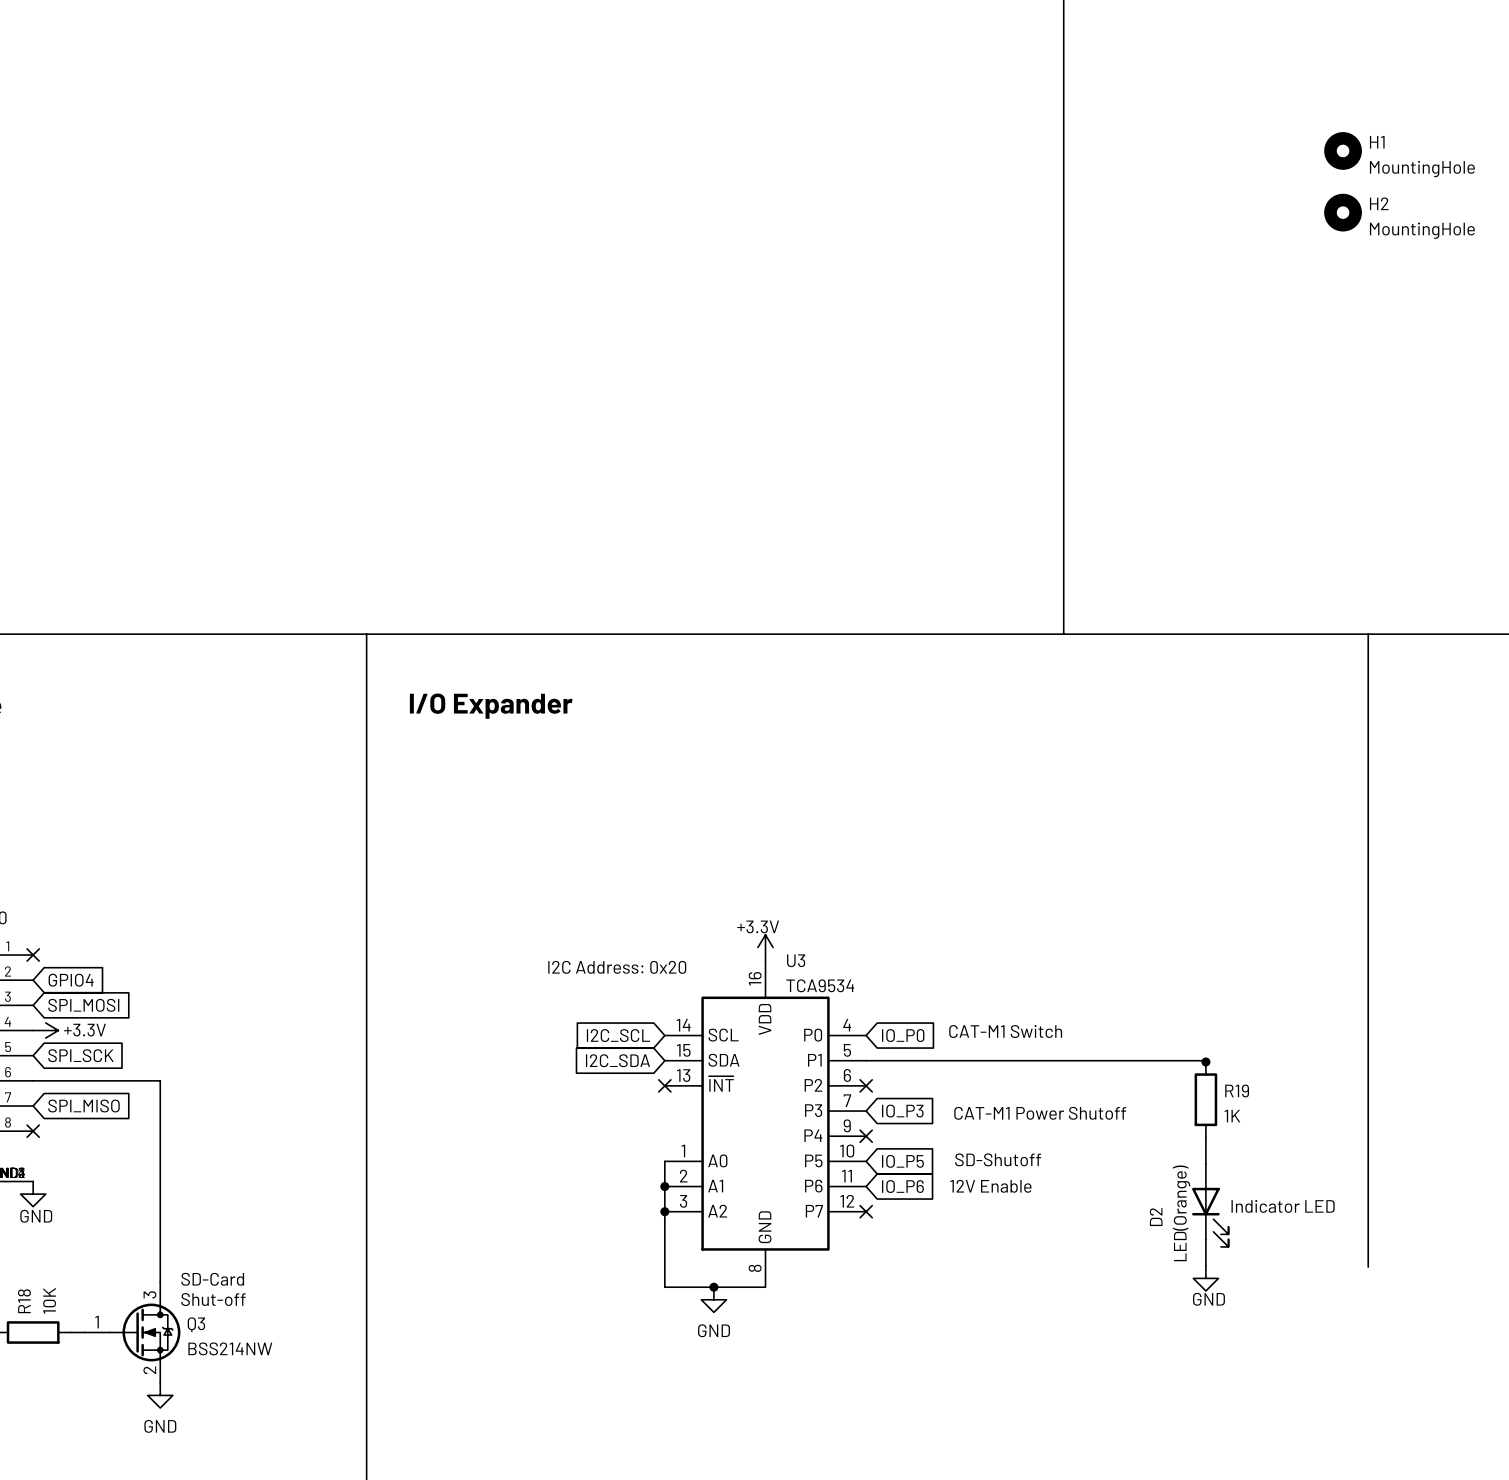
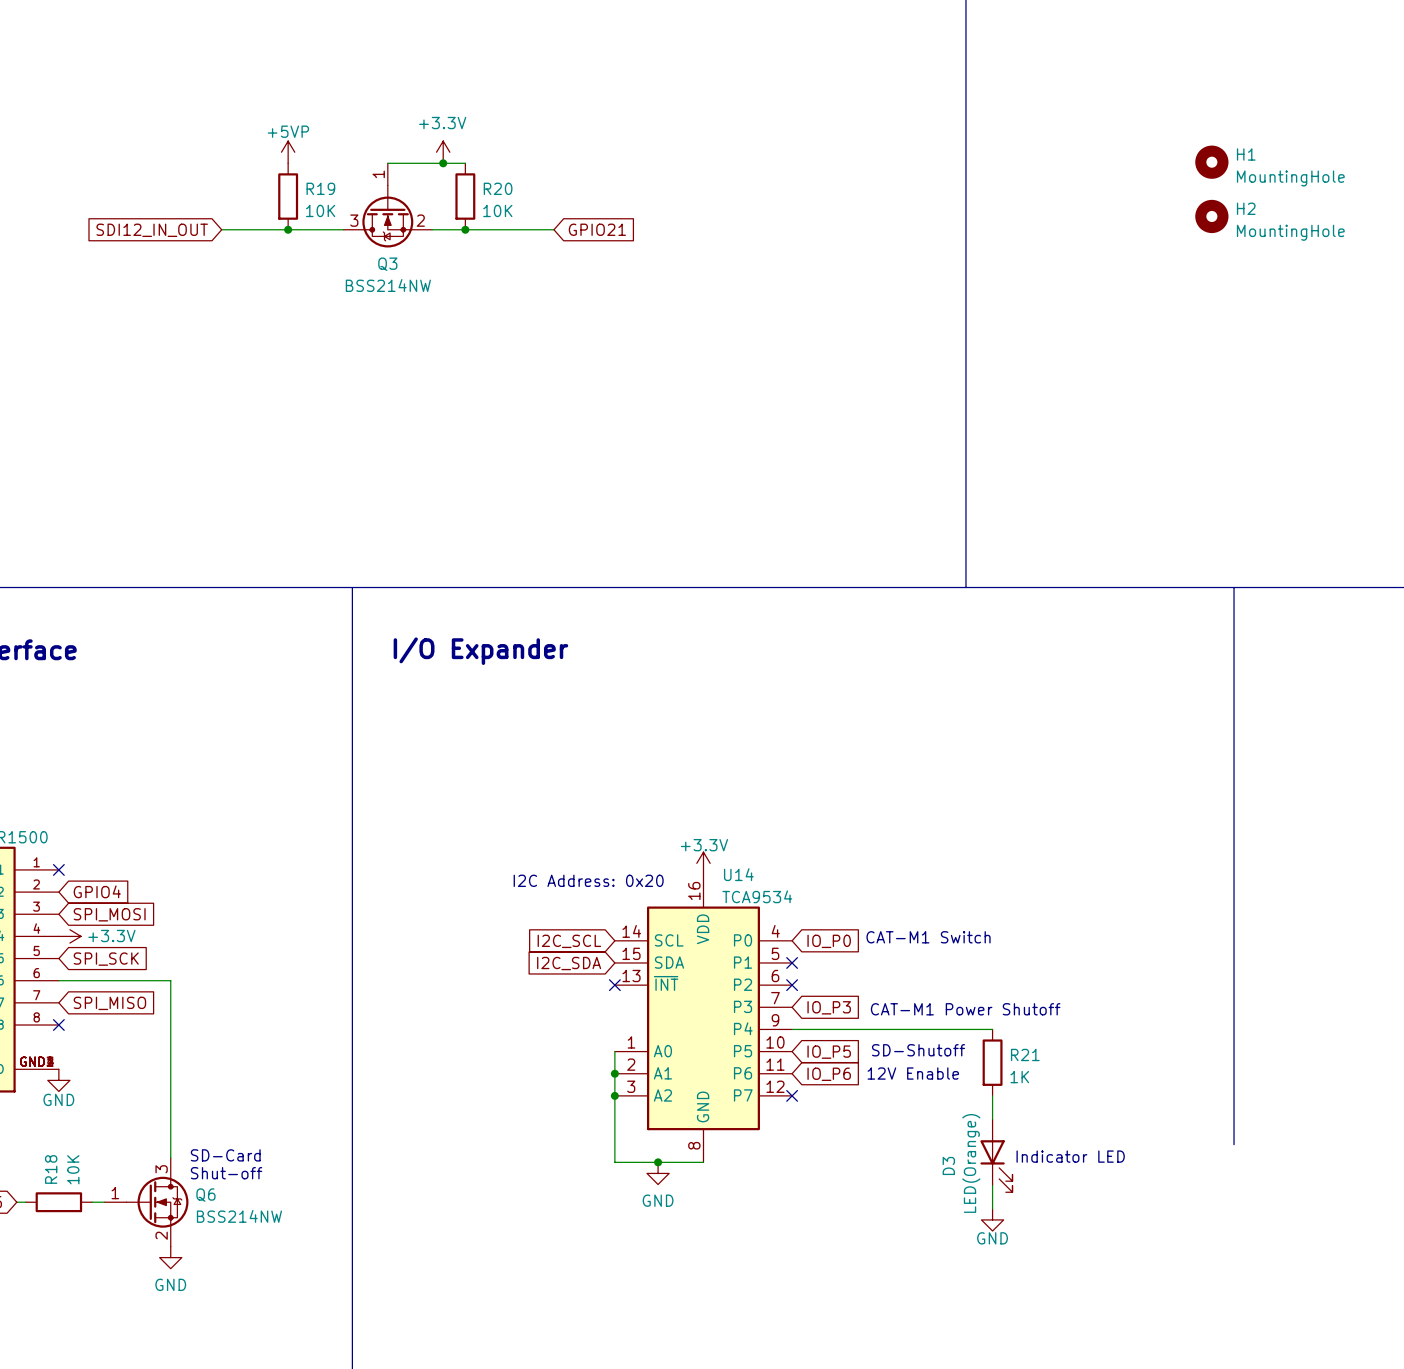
power symbol: none -> +5VP (288, 152)
power symbol: none -> +3.3V (443, 152)
wire: none -> (387, 163) (465, 163)
junction: none -> (443, 163)
R20: none -> 10K (465, 196)
Q3: none -> BSS214NW (387, 205)
global label: none -> SDI12_IN_OUT (152, 230)
wire: none -> (221, 229) (343, 229)
junction: none -> (288, 229)
wire: none -> (432, 229) (553, 229)
junction: none -> (465, 229)
global label: none -> GPIO21 (597, 229)
U3 name: U3 (796, 960) -> U14 (738, 874)
wire: (866, 1060) (1205, 1061) -> none
no-connect mark: none -> (792, 962)
junction: (1205, 1061) -> none
R19 position: (1205, 1099) -> (288, 196)
R19 value: 1K (1232, 1116) -> 10K (320, 210)
wire: none -> (792, 1029) (992, 1029)
no-connect mark: (866, 1136) -> none
wire: (1205, 1137) (1205, 1163) -> (992, 1095) (992, 1119)
R21: none -> 1K (992, 1062)
D2: LED(Orange) (1210, 1205) -> none
text position: Indicator LED (1283, 1206) -> Indicator LED (1070, 1156)
wire: (1205, 1239) (1205, 1265) -> (992, 1185) (992, 1208)
power symbol position: GND (1205, 1278) -> GND (992, 1219)
D3: none -> LED(Orange) (996, 1155)
Q3 name: Q3 (196, 1324) -> Q6 (205, 1195)

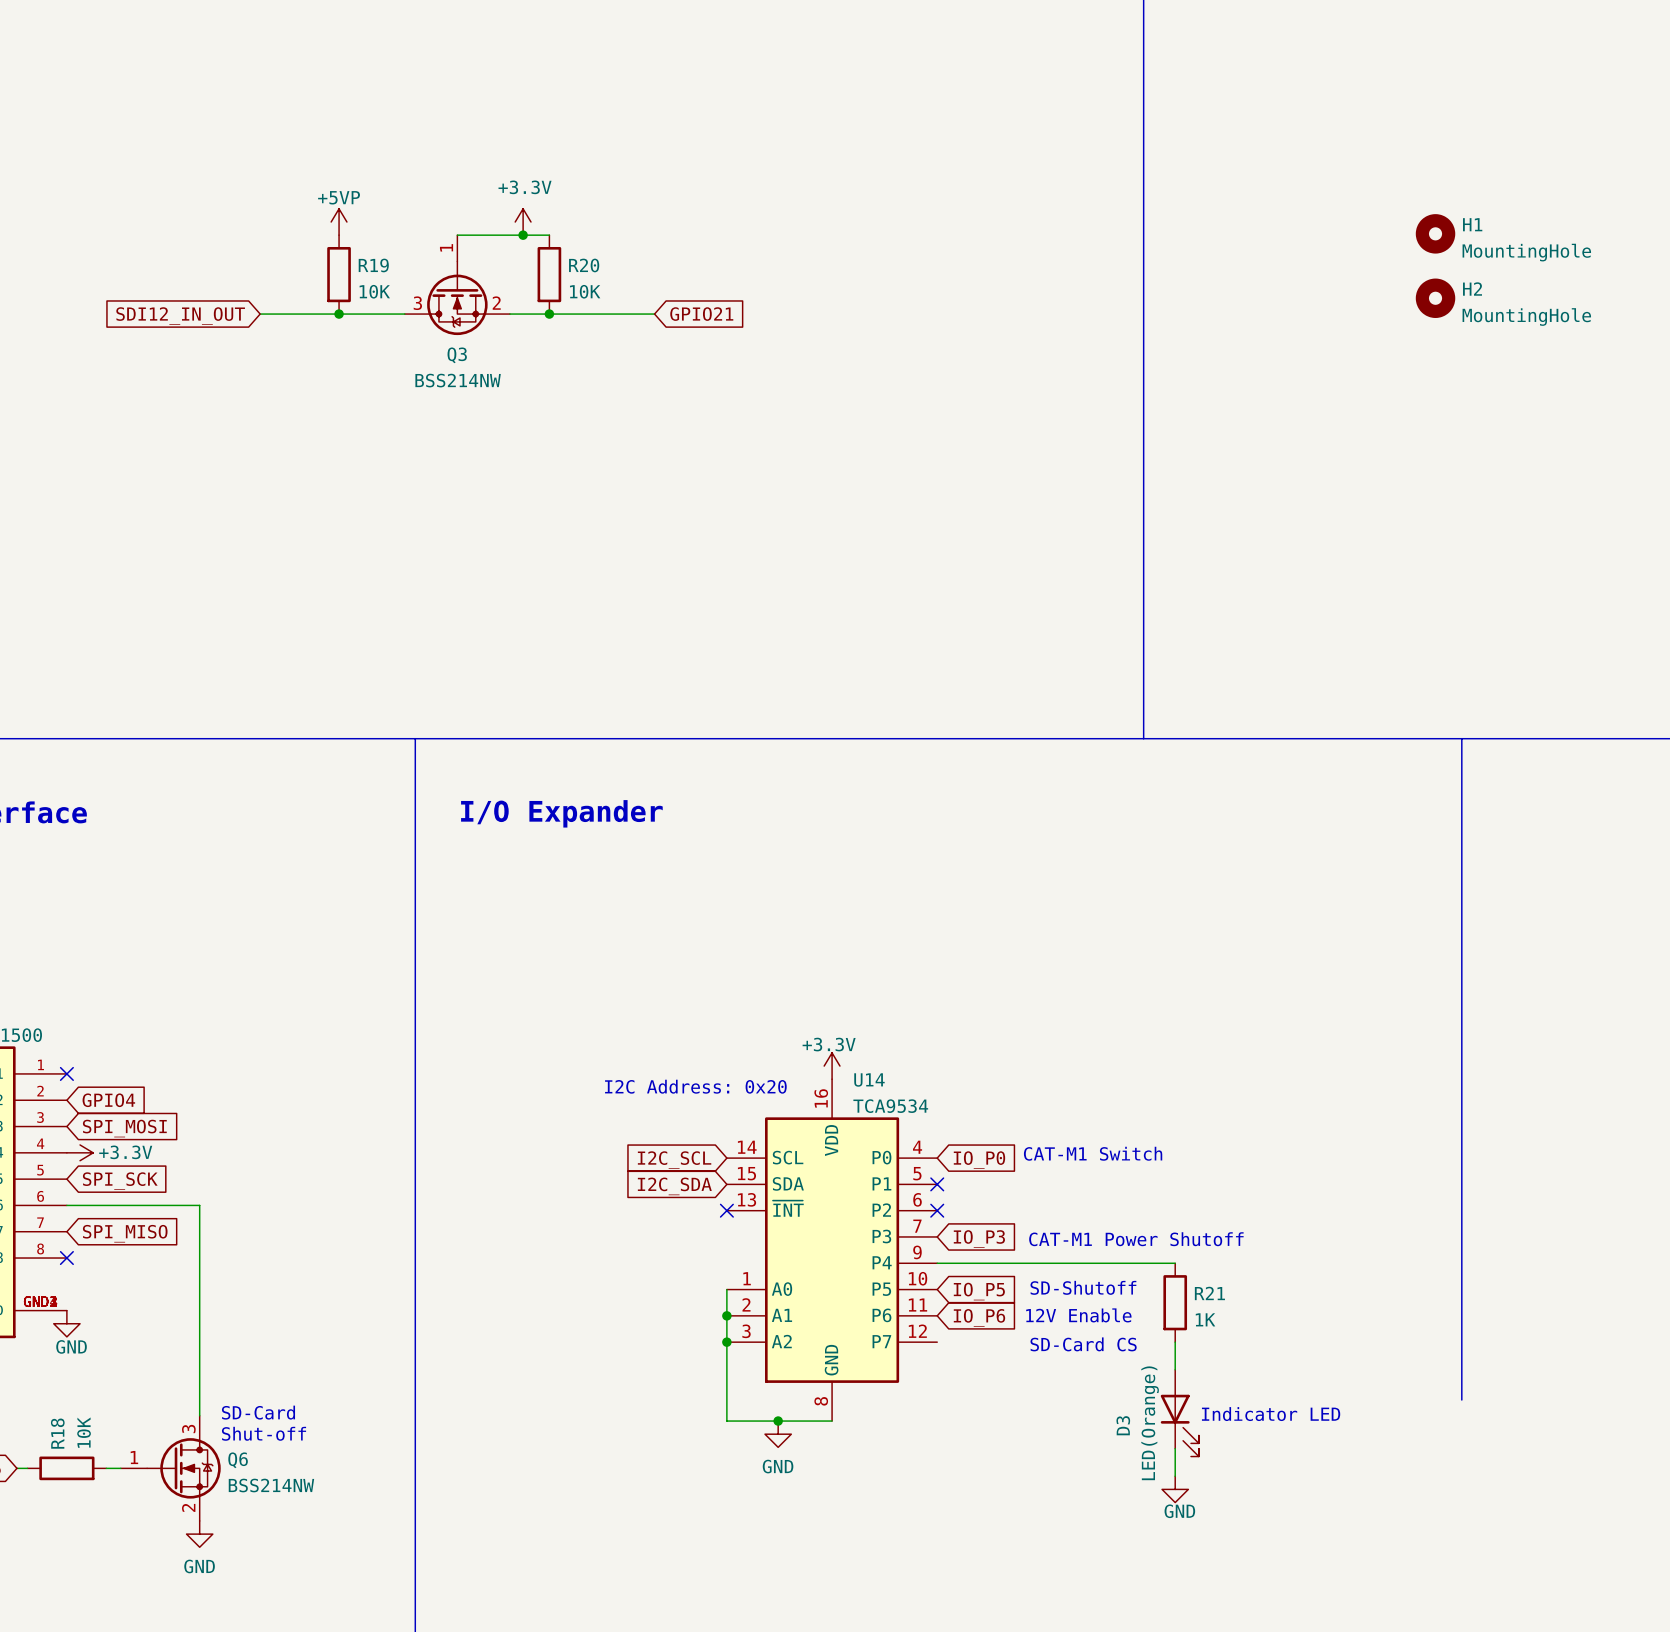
no-connect mark: (792, 1095) -> none
text: none -> SD-Card CS (1083, 1344)

